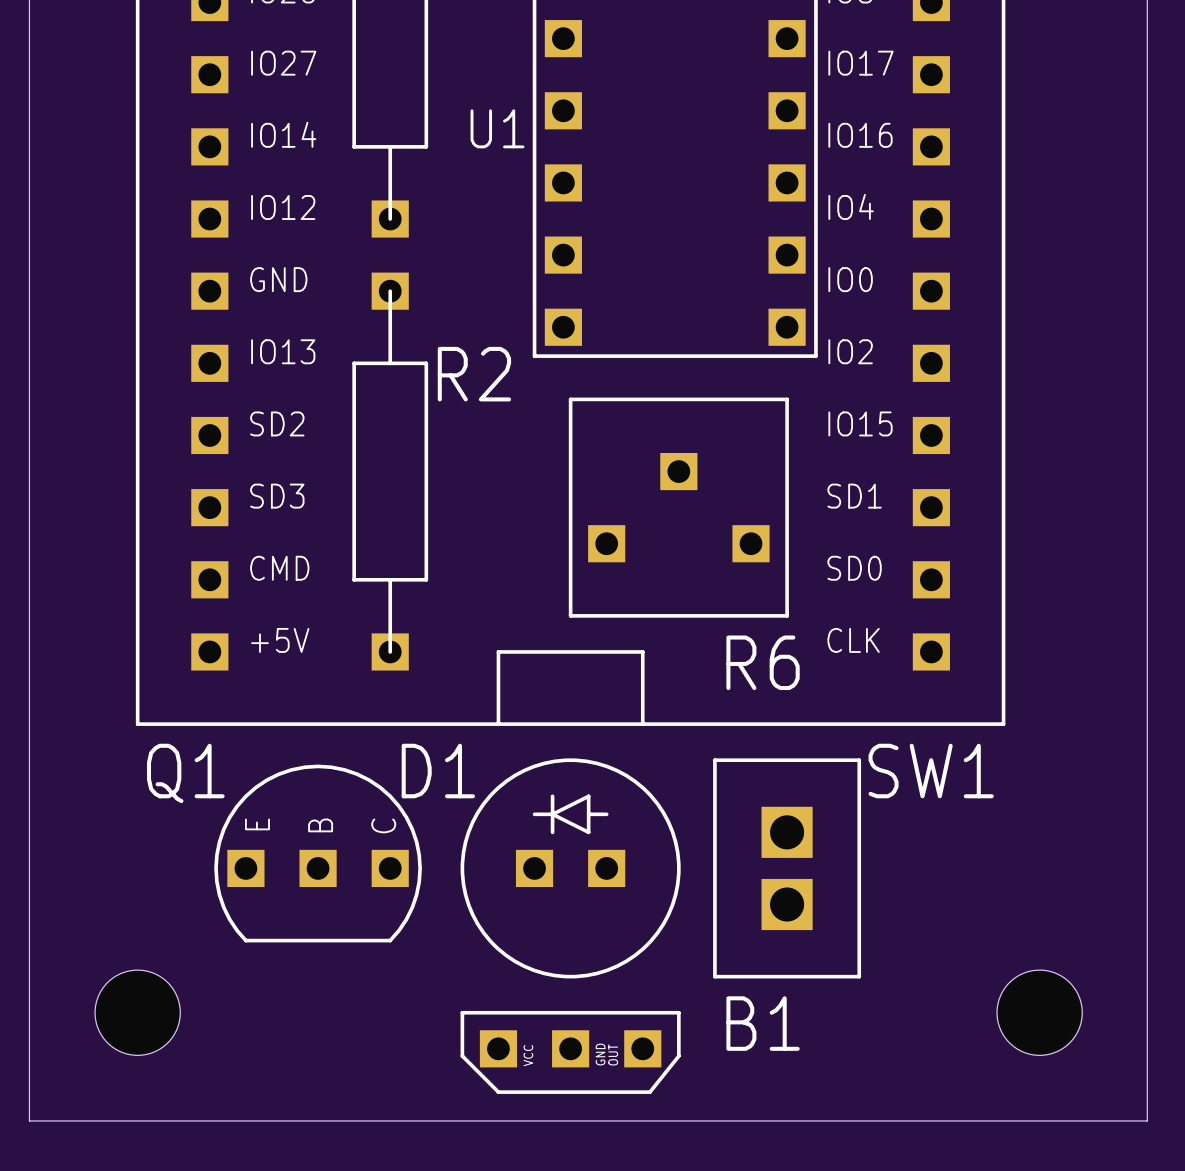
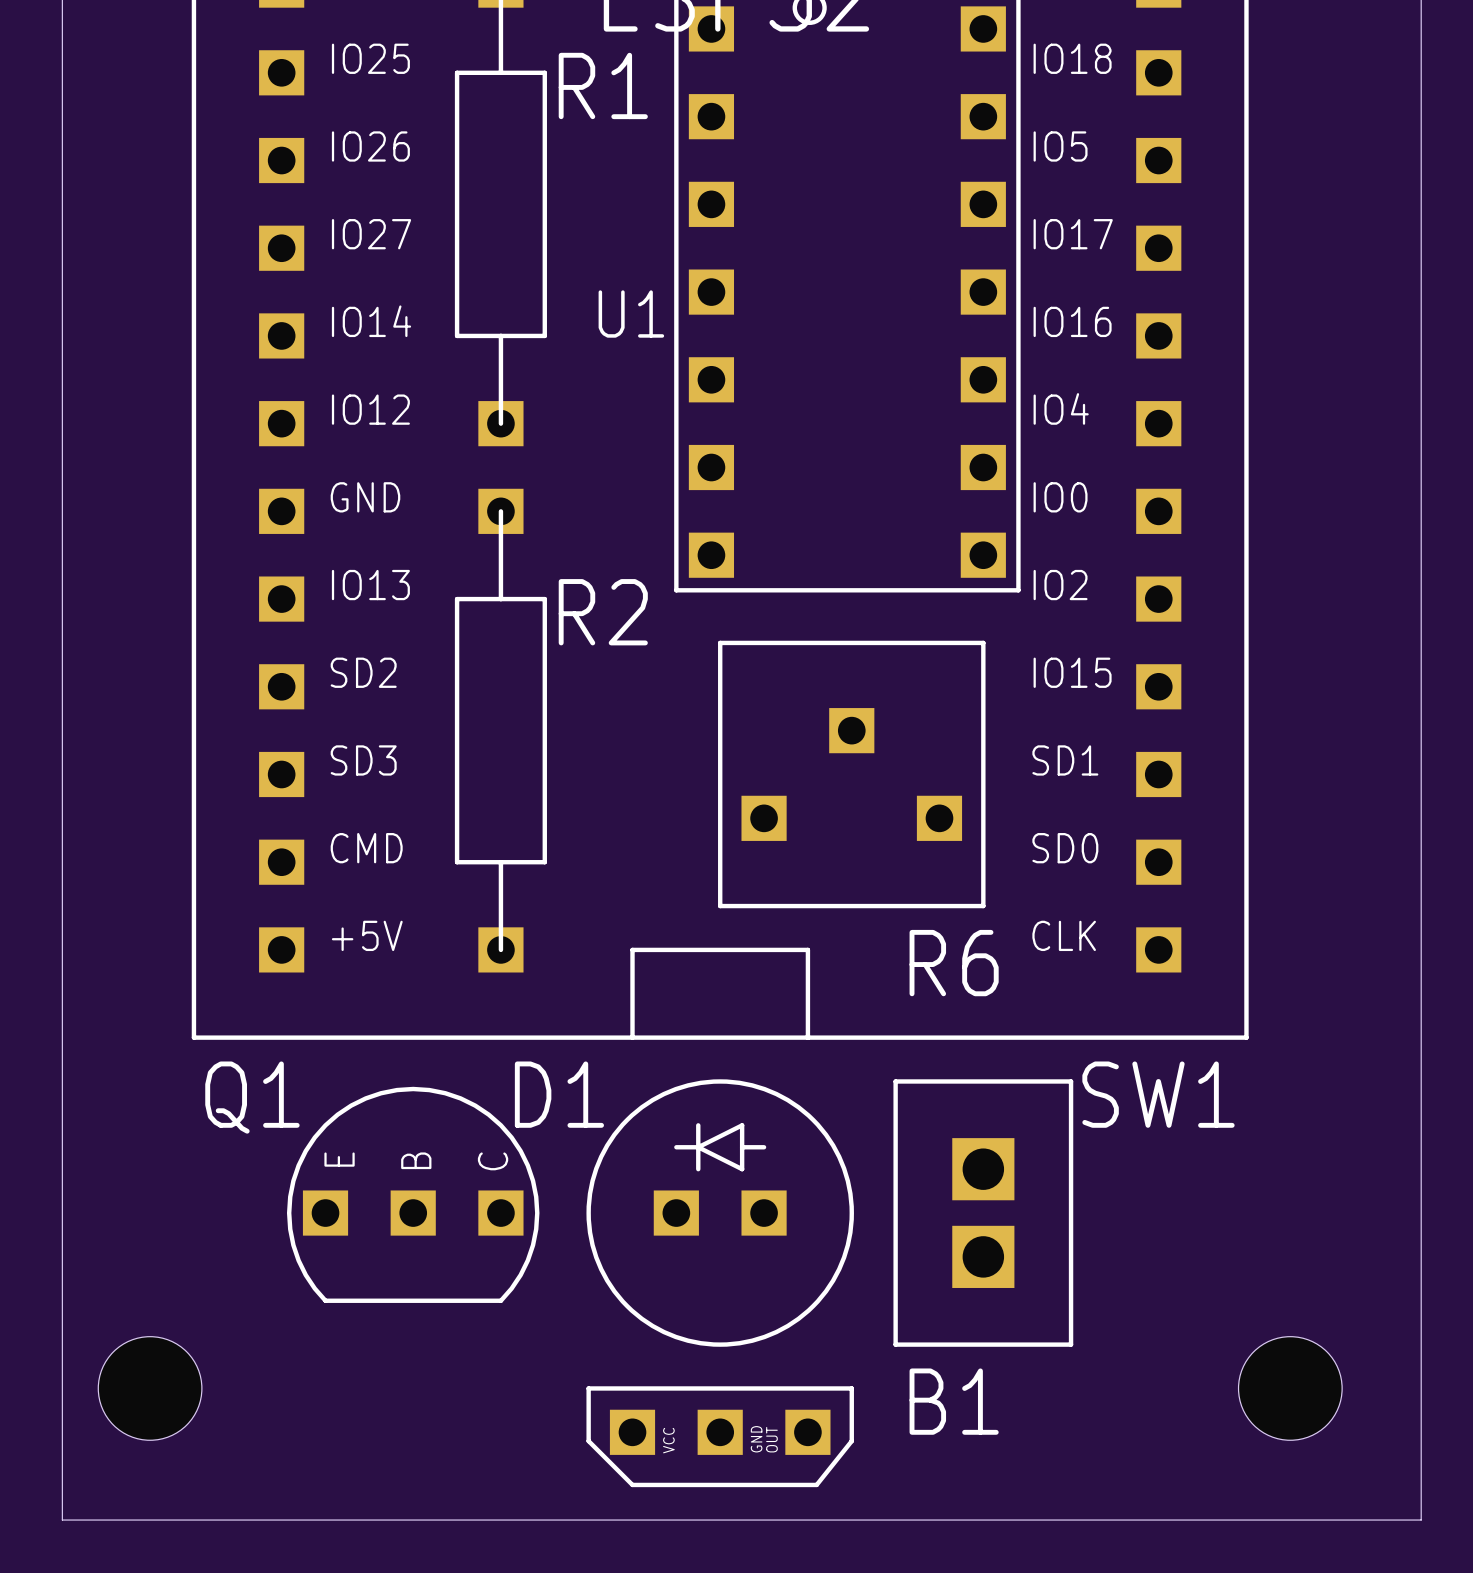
hole position: (137, 1012) -> (150, 1388)

